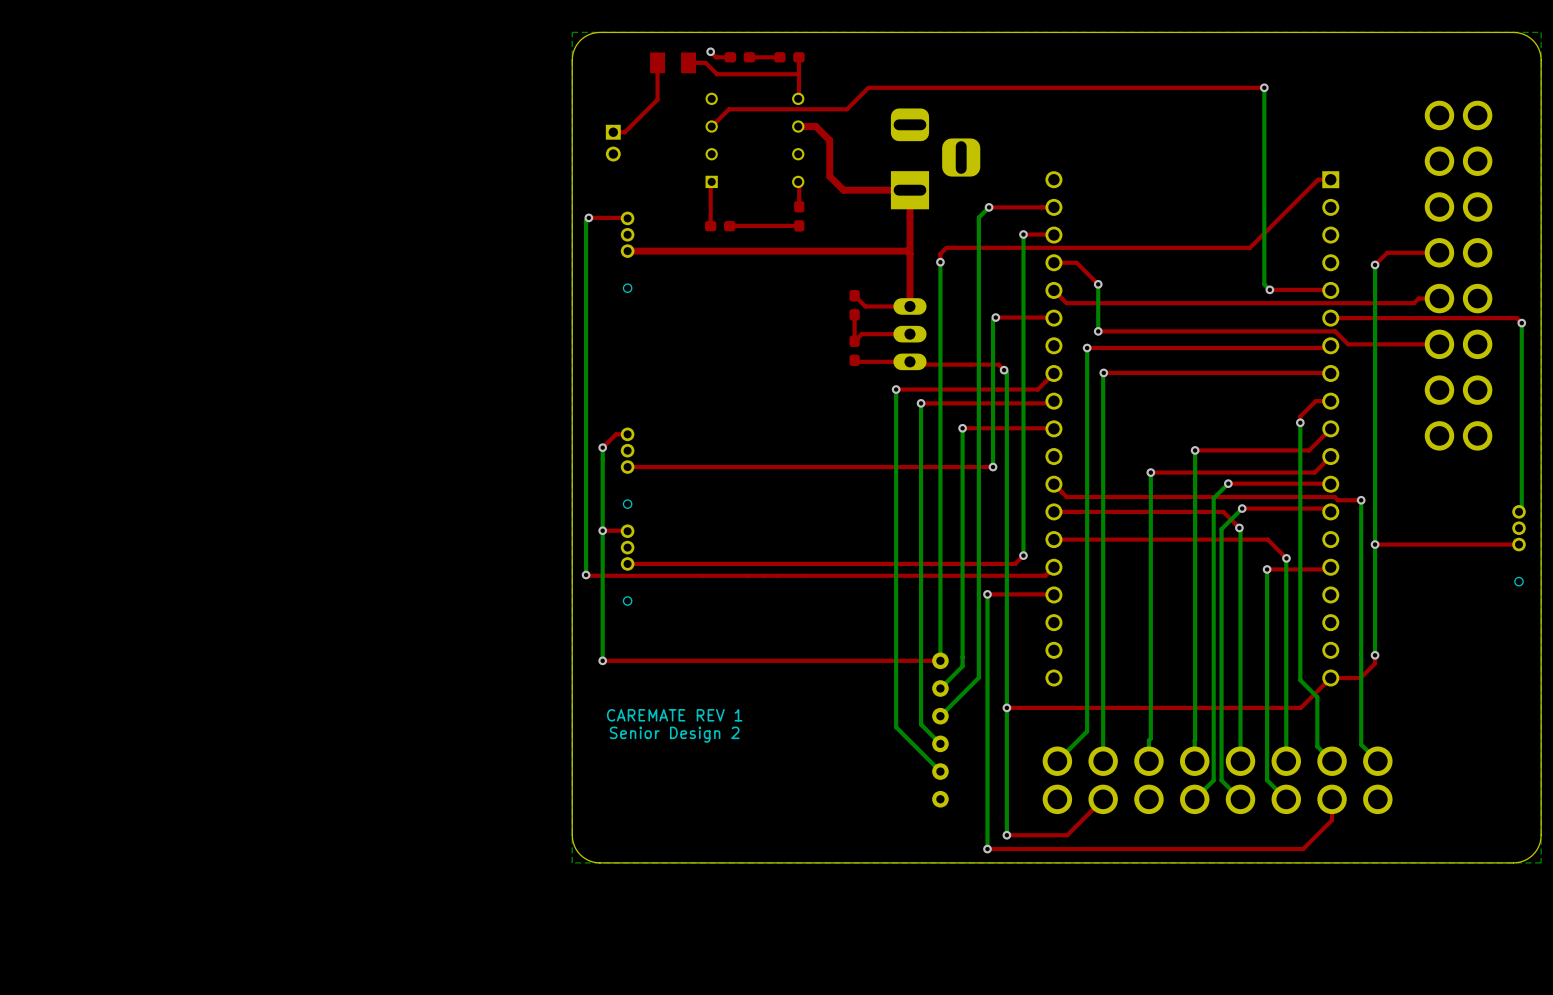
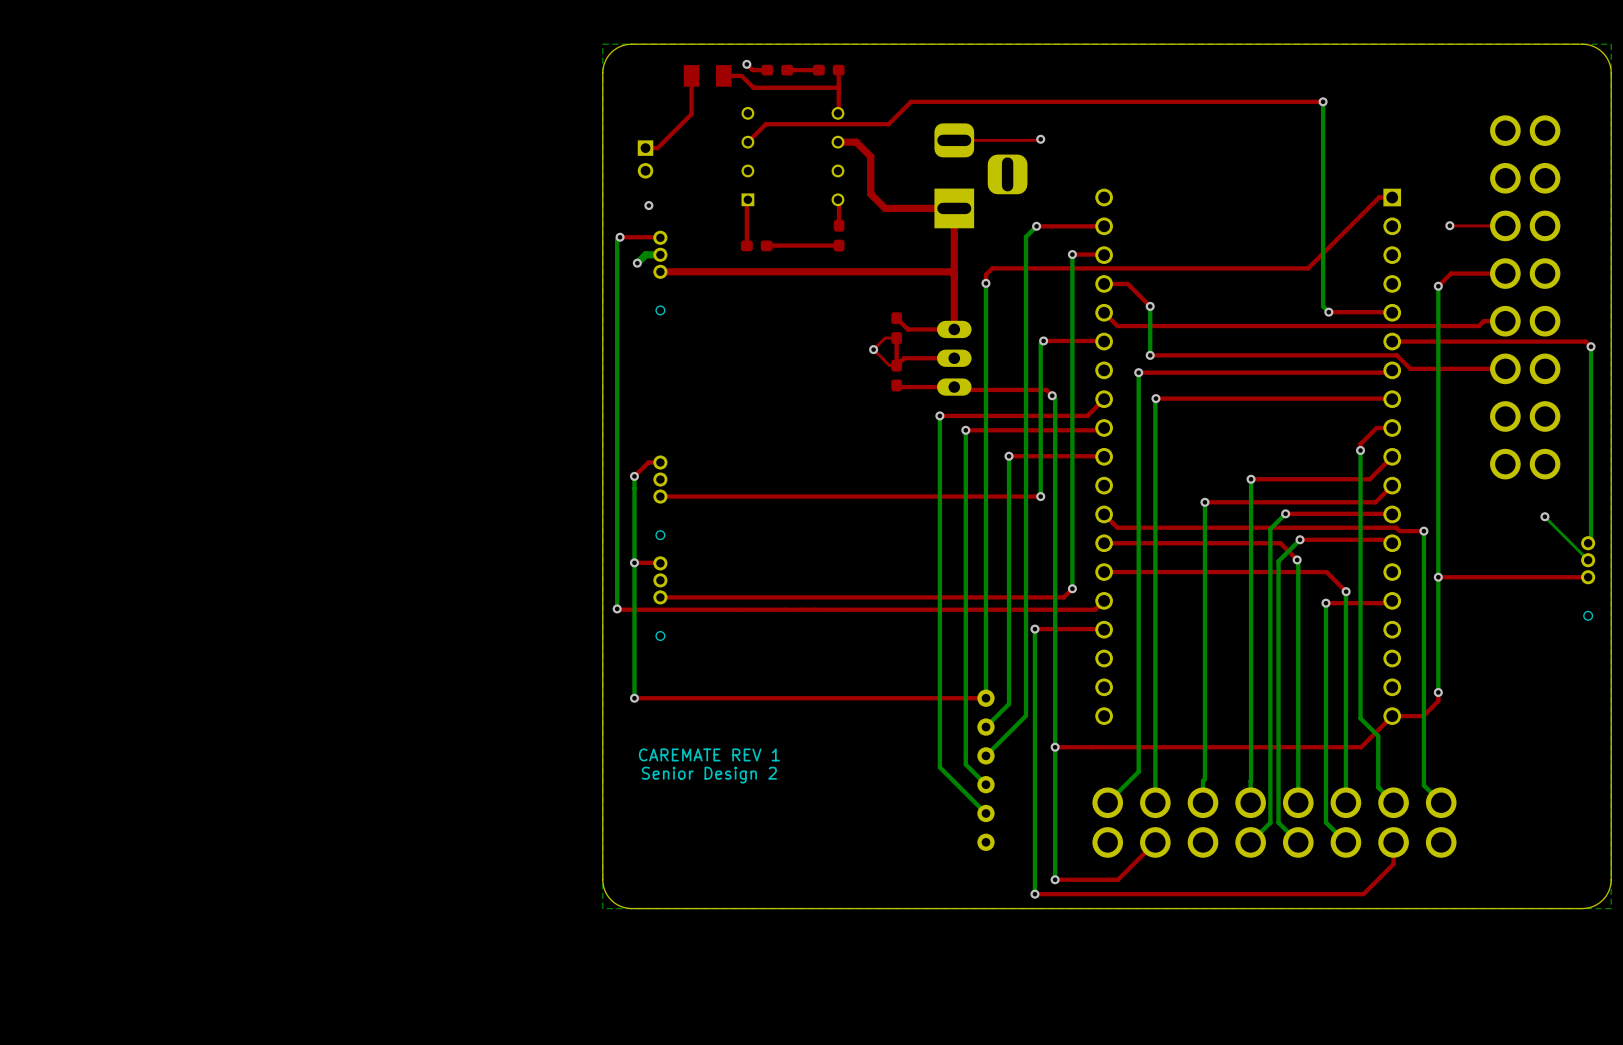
top track: none -> (1040, 139) (954, 140)
via: none -> (1040, 139)
via: none -> (648, 205)
top track: none -> (1449, 225) (1505, 225)
via: none -> (1449, 225)
bottom track: none -> (660, 254) (645, 254) (637, 263)
via: none -> (637, 263)
top track: none -> (896, 338) (885, 338) (873, 349) (889, 365) (896, 365)
via: none -> (873, 349)
bottom track: none -> (1544, 516) (1588, 560)
via: none -> (1544, 516)

